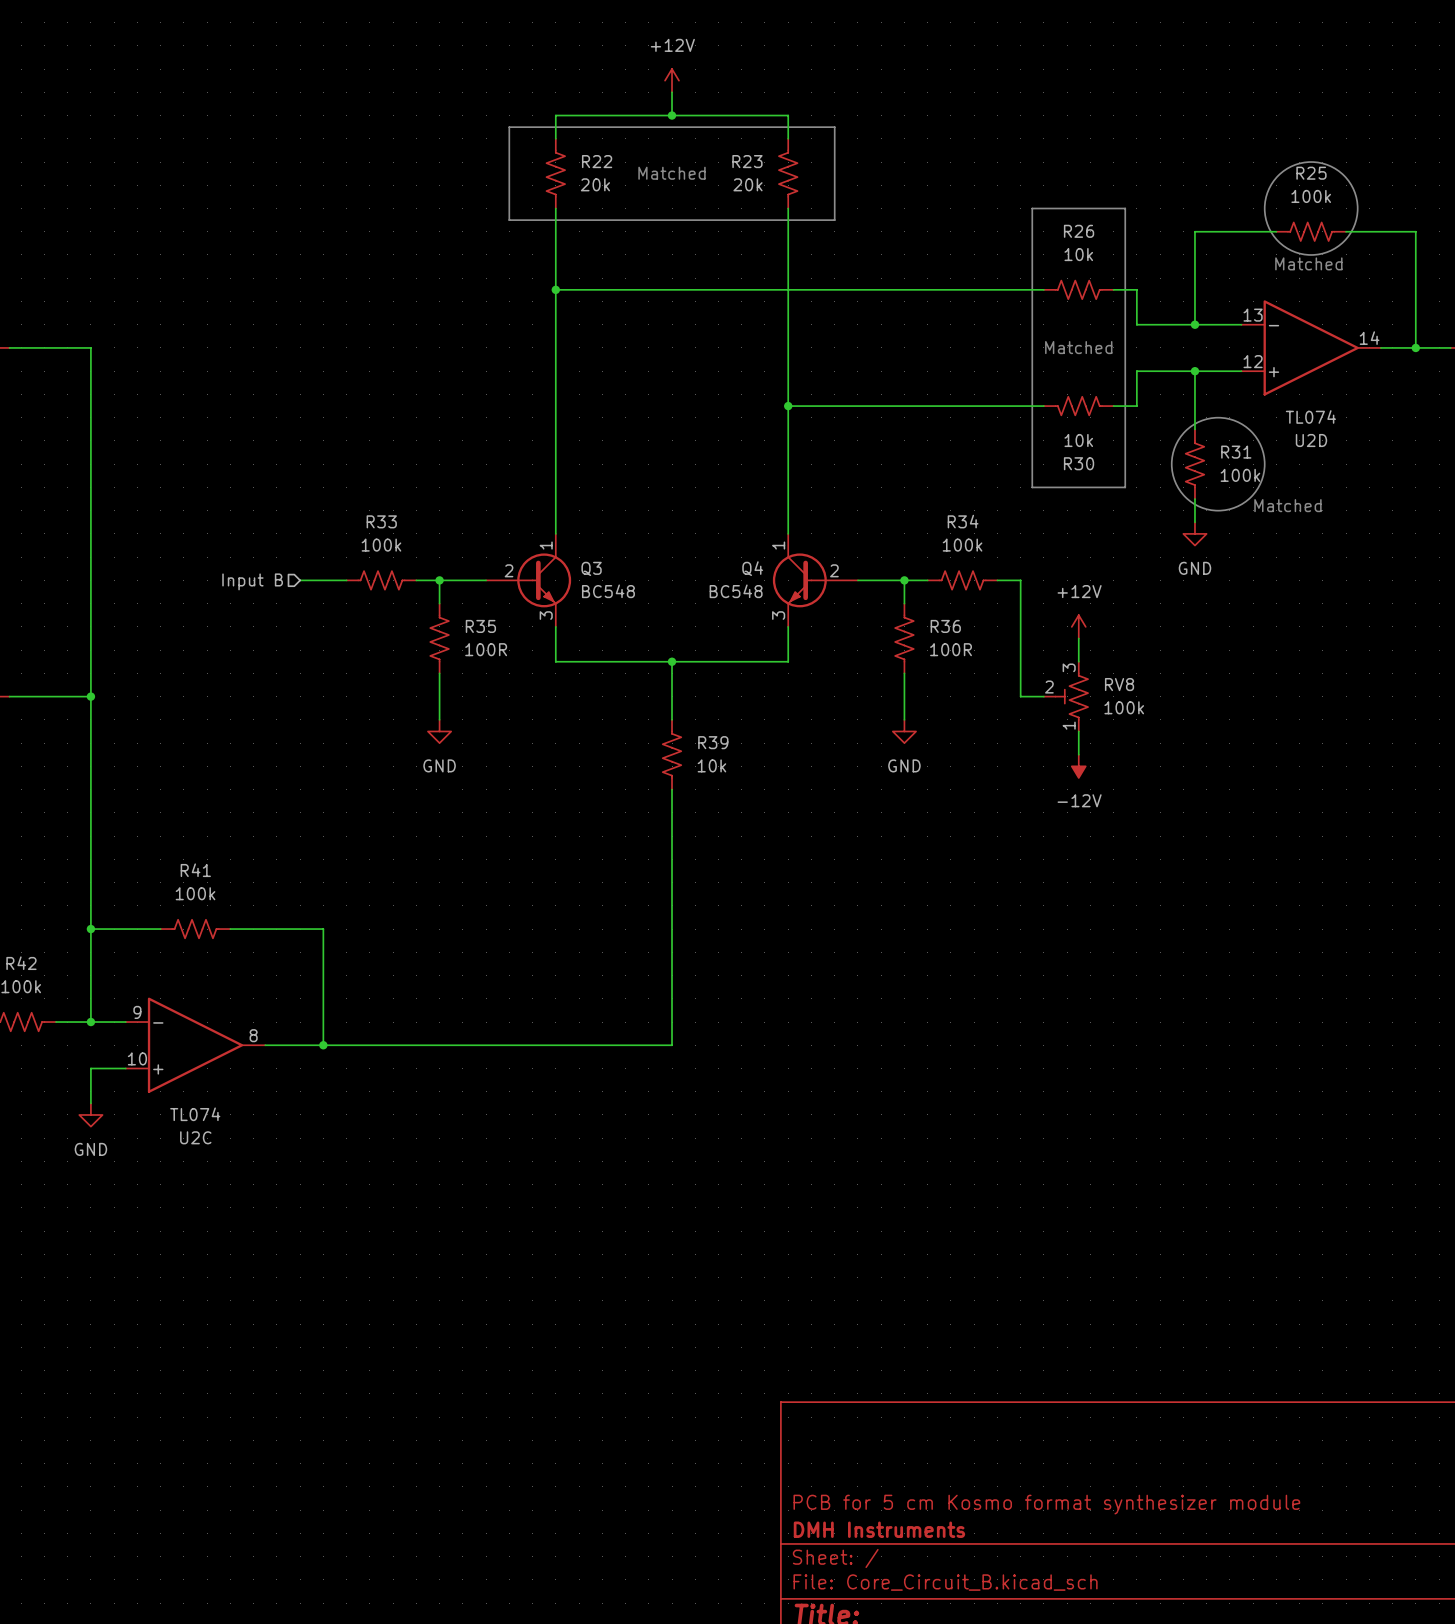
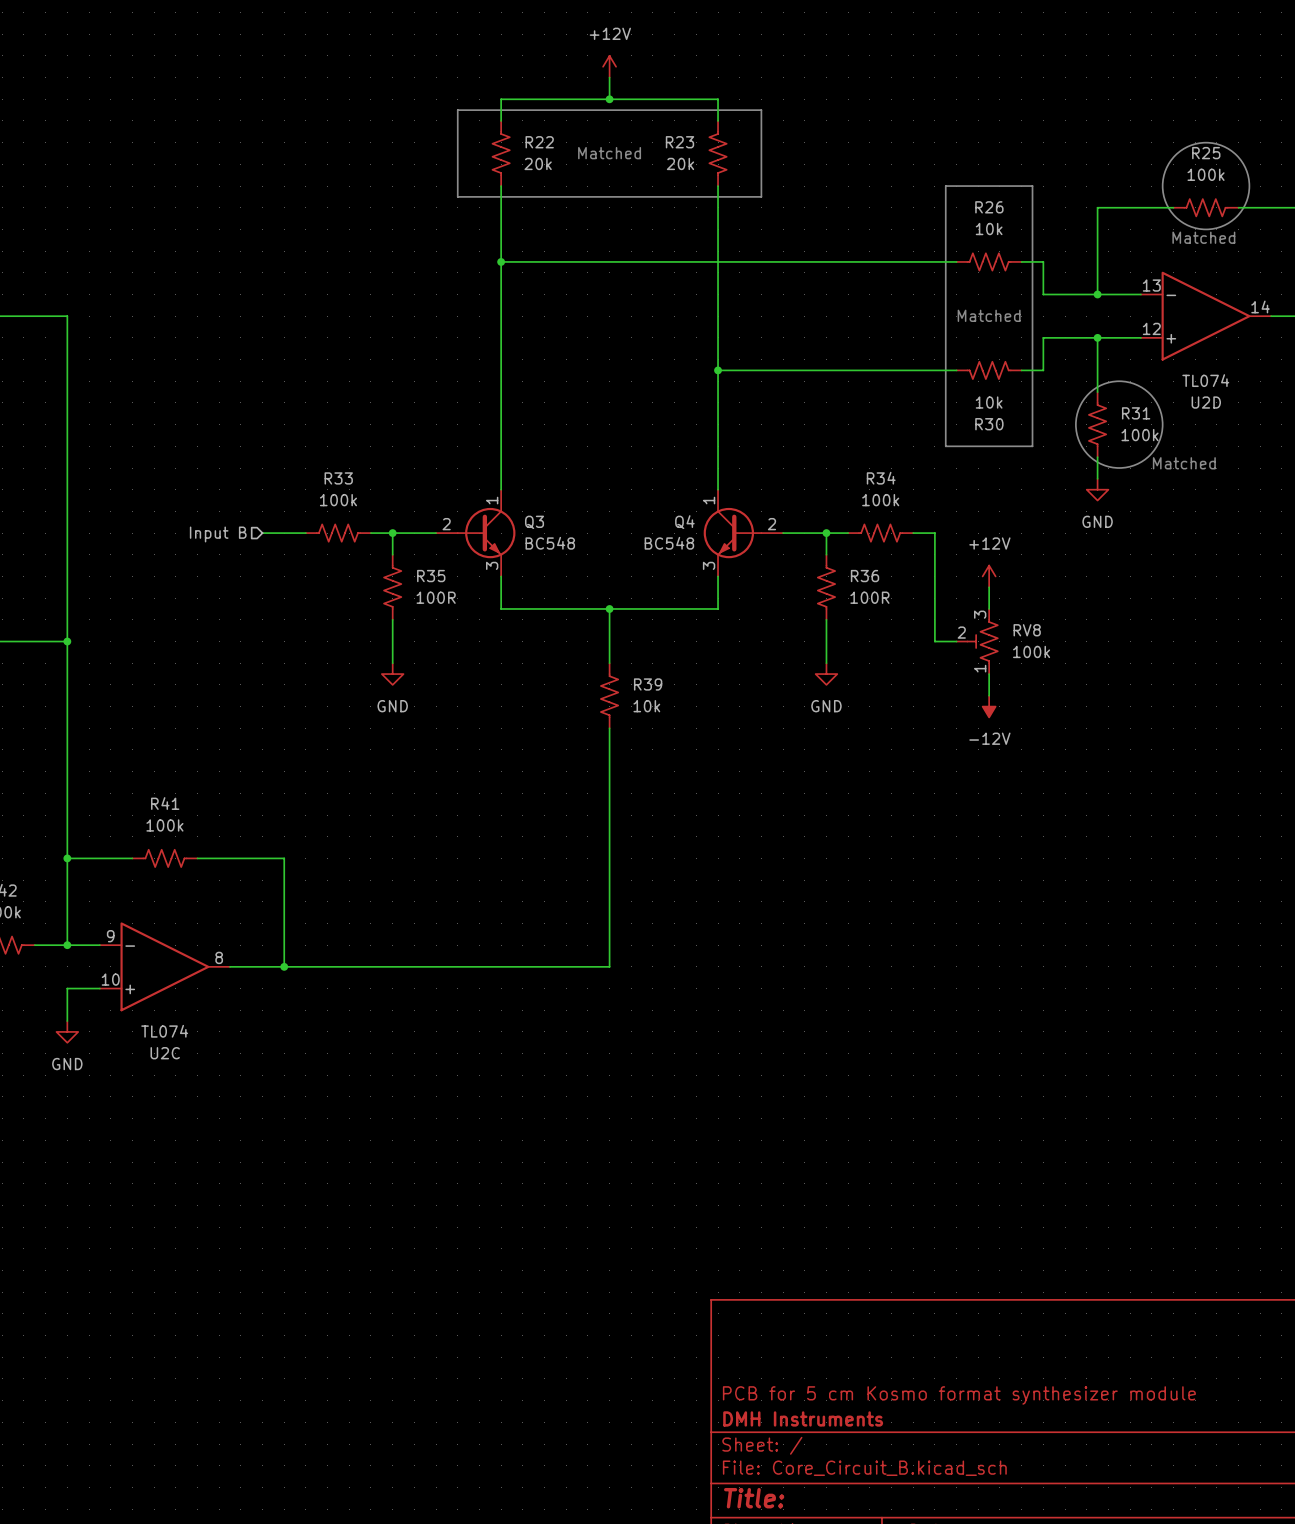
Q3 symbol: [486, 533, 572, 627] -> [436, 489, 516, 577]
Q4 symbol: [772, 533, 858, 627] -> [703, 489, 784, 577]

